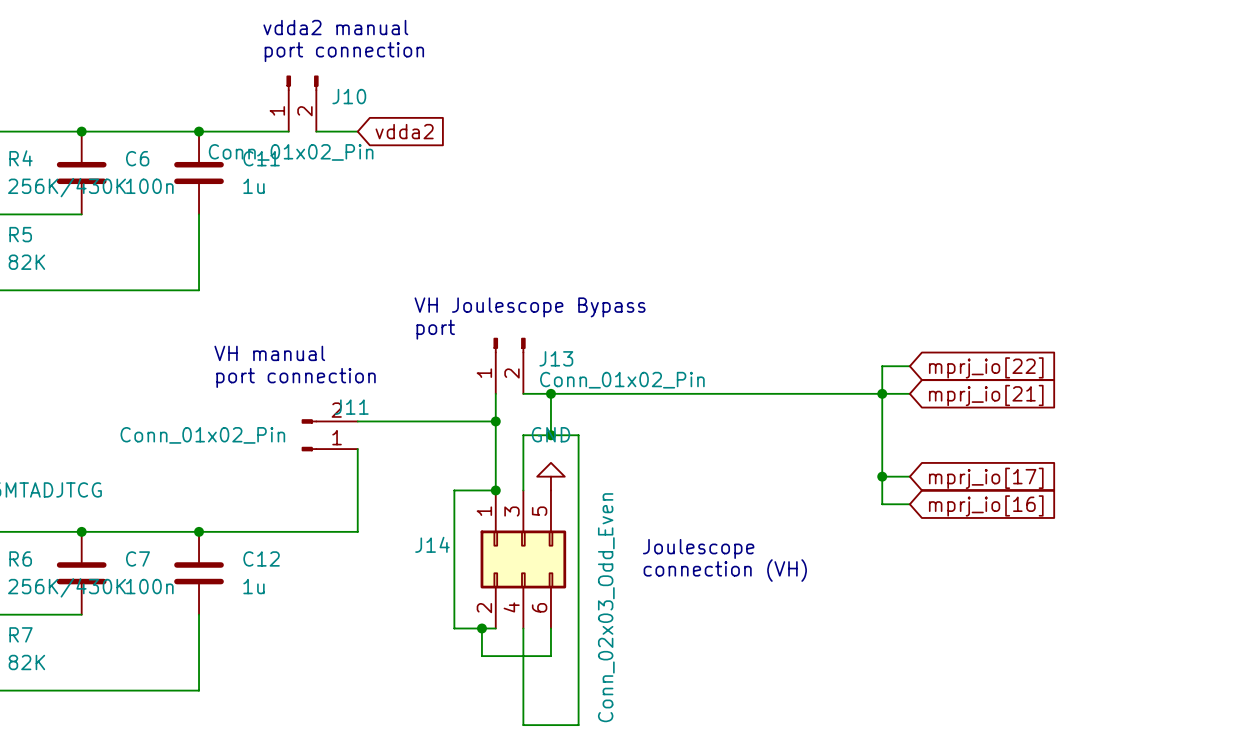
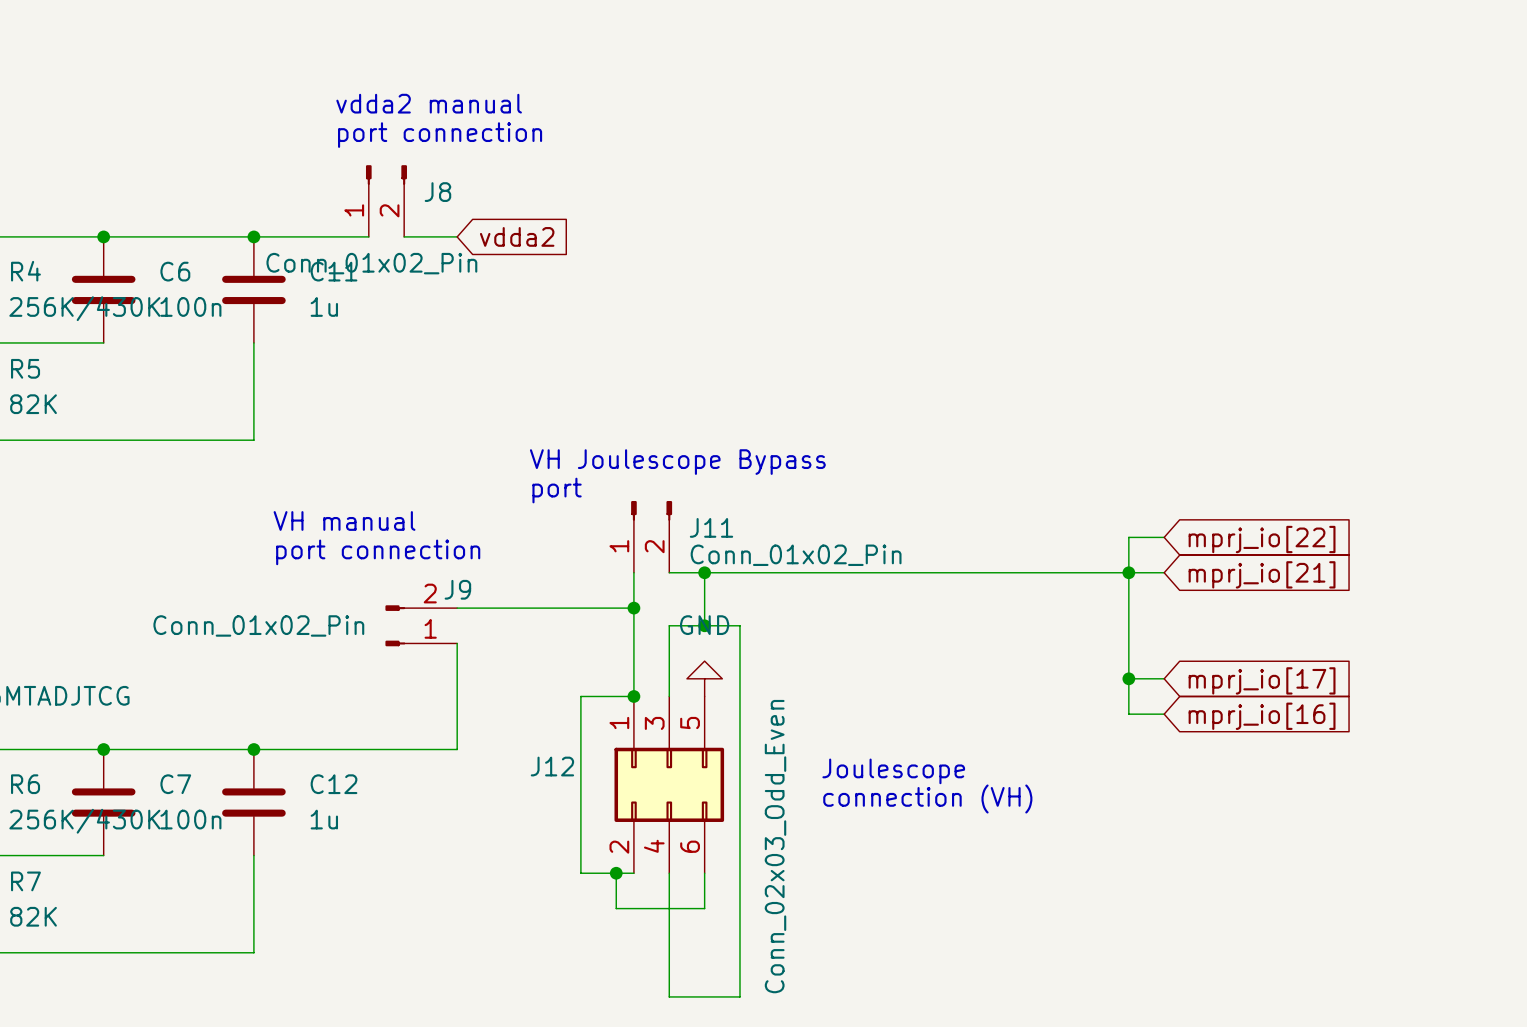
J10 name: J10 (349, 96) -> J8 (437, 192)
J13 name: J13 (556, 358) -> J11 (711, 527)
J11 name: J11 (351, 407) -> J9 (457, 589)
J14 name: J14 (432, 544) -> J12 (552, 766)

